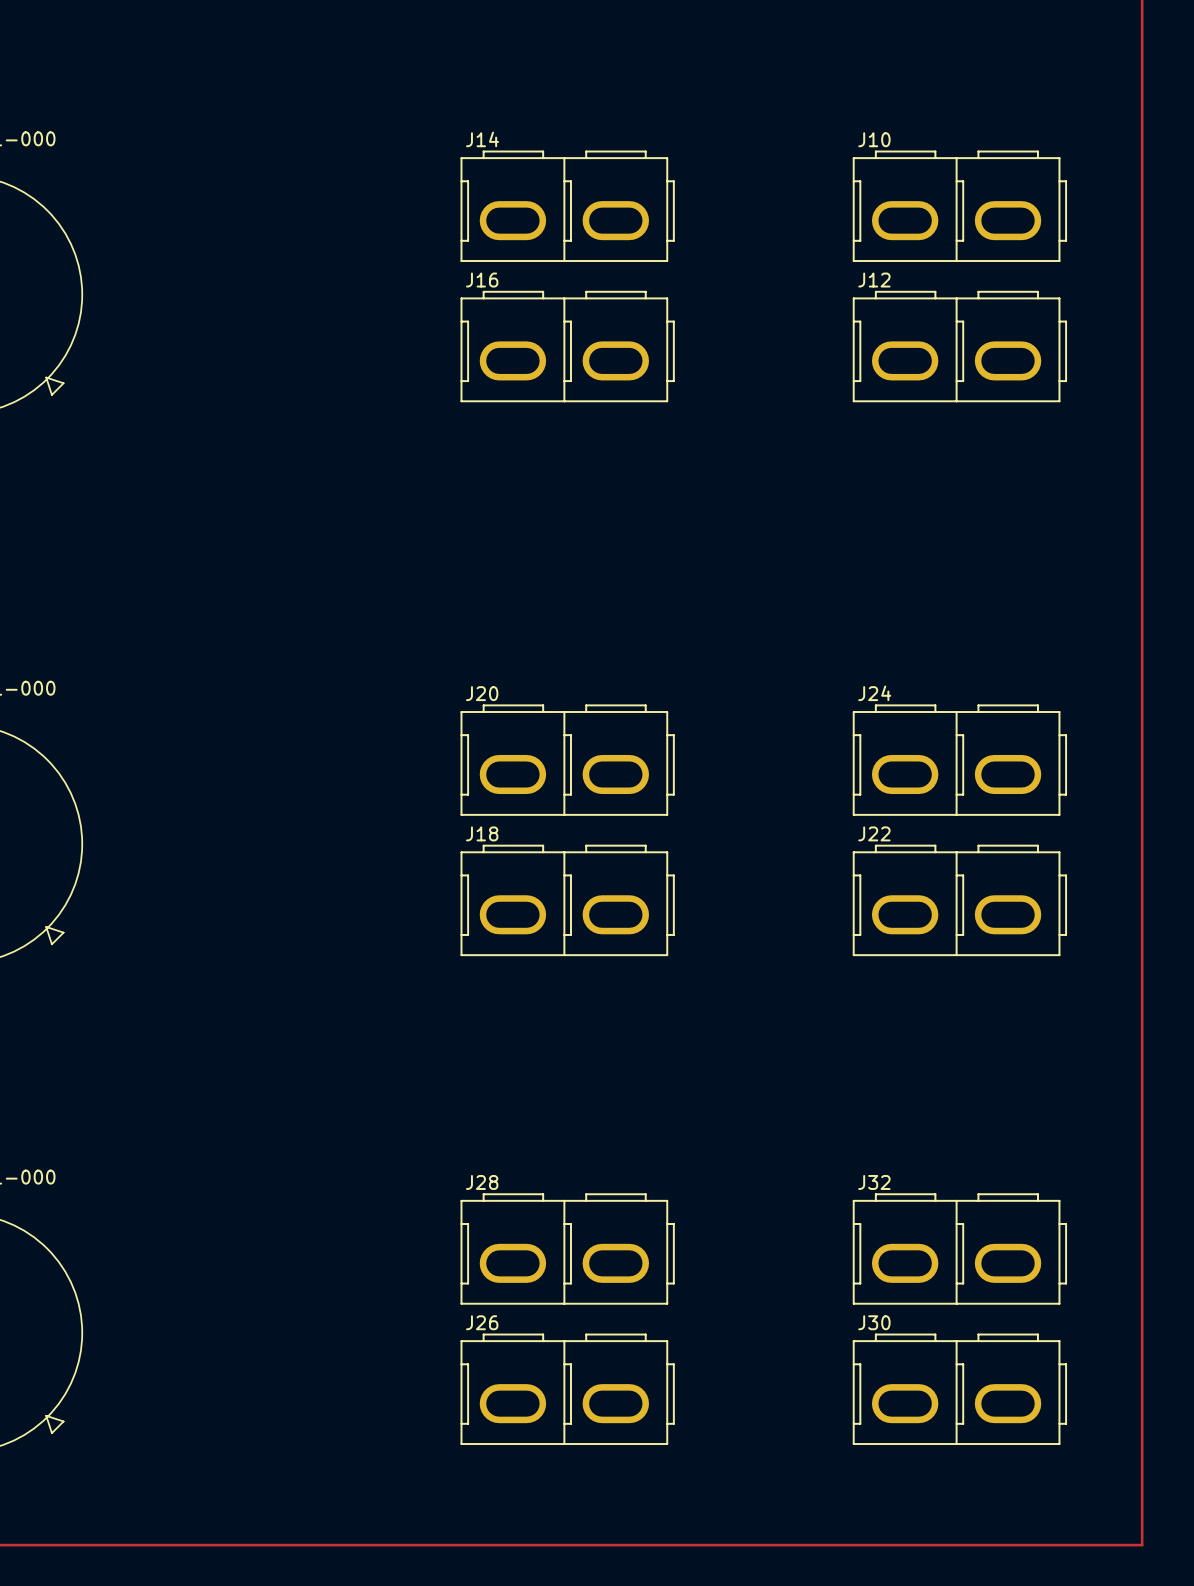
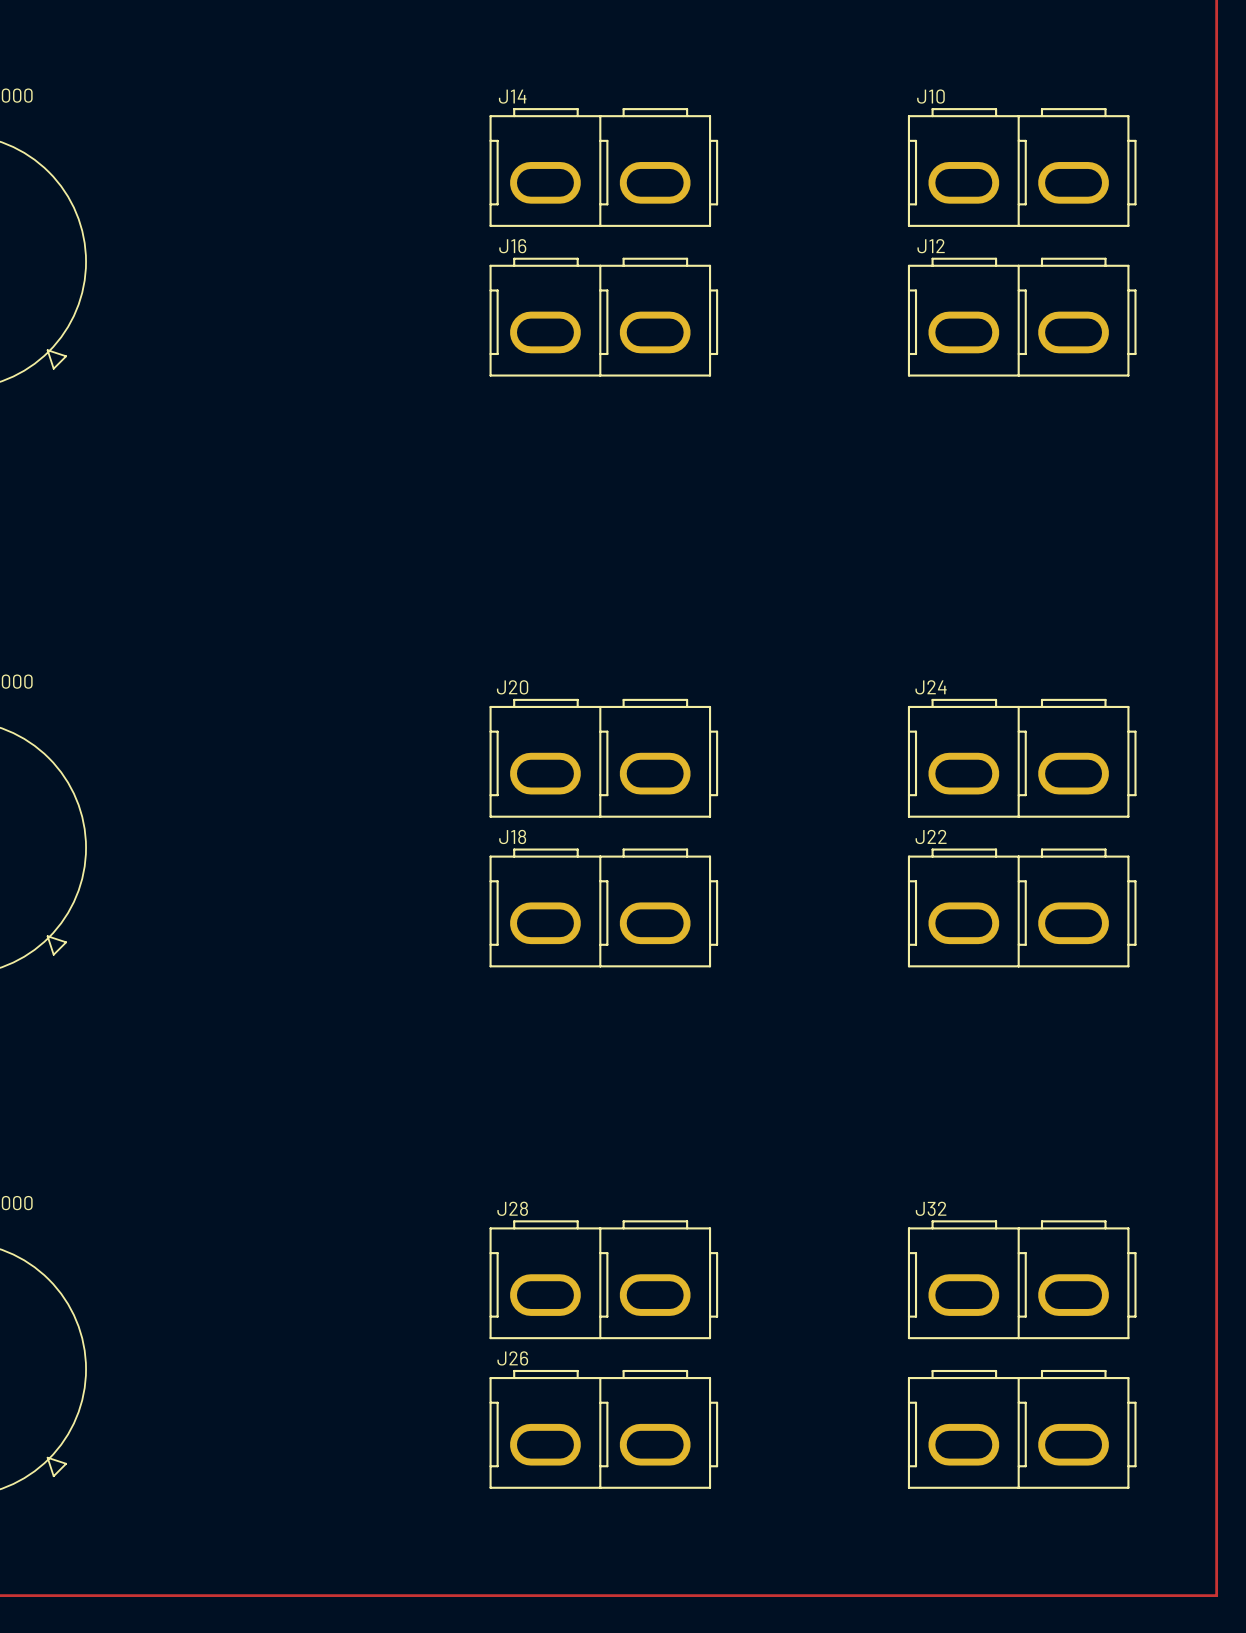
J30 name: J30 (874, 1322) -> none

